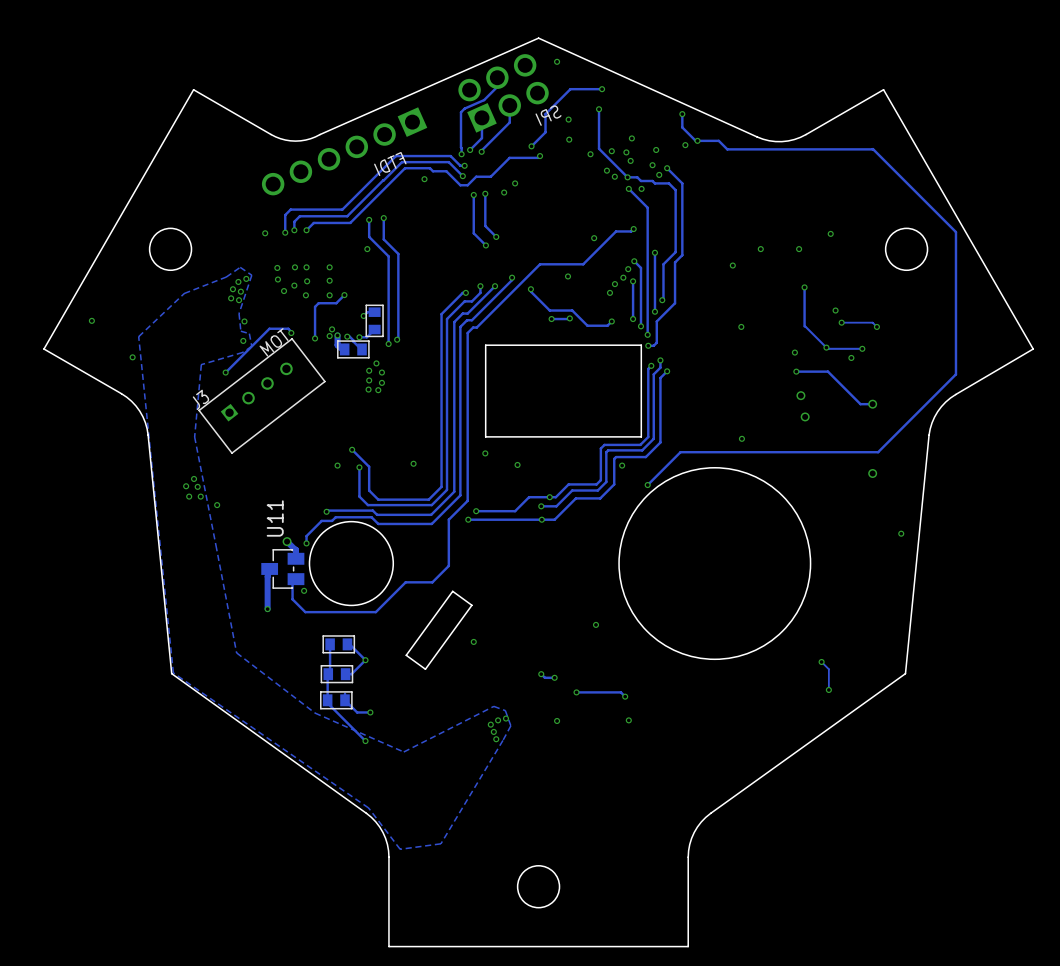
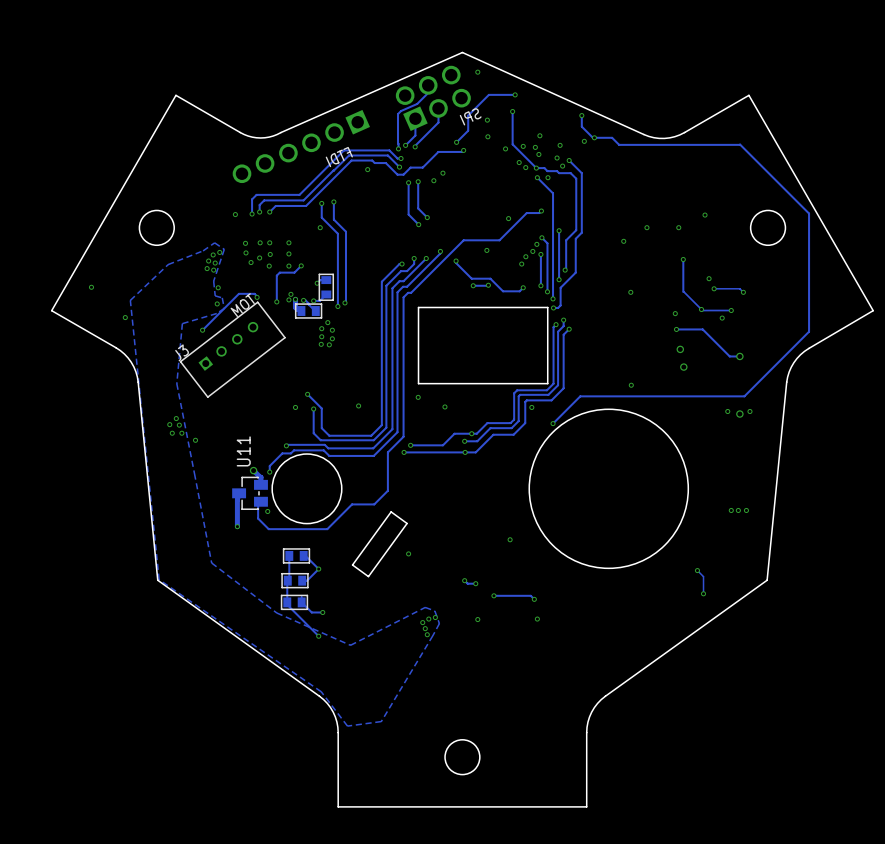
via: none -> (727, 411)
via: none -> (749, 411)
via: (901, 533) -> none
via: none -> (731, 510)
via: none -> (738, 510)
via: none -> (746, 510)

